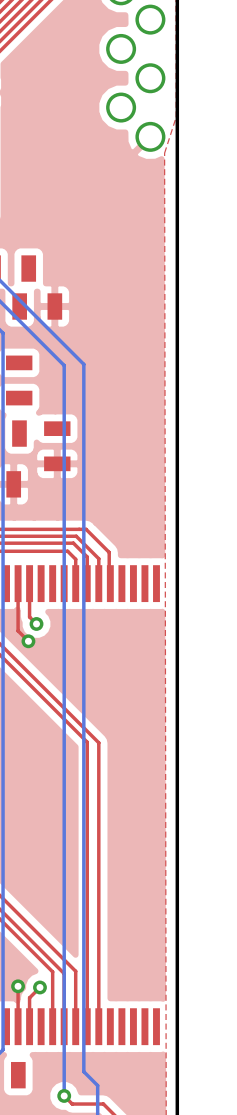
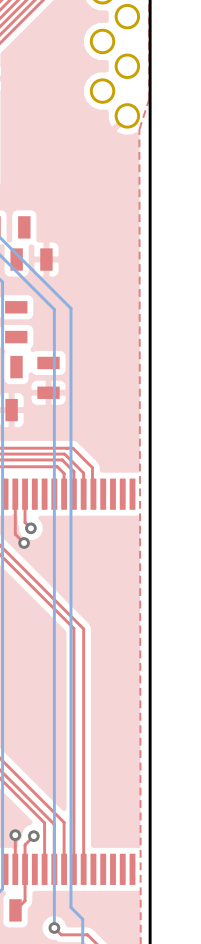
top track: none -> (25, 869) (25, 900) (15, 910)

